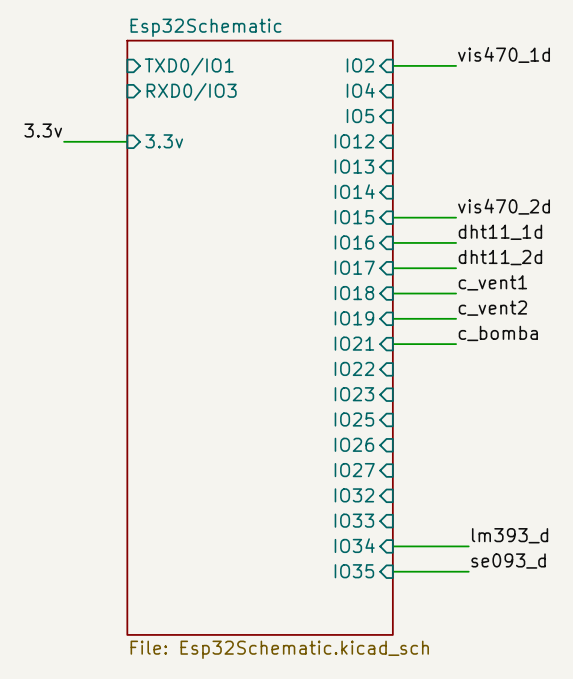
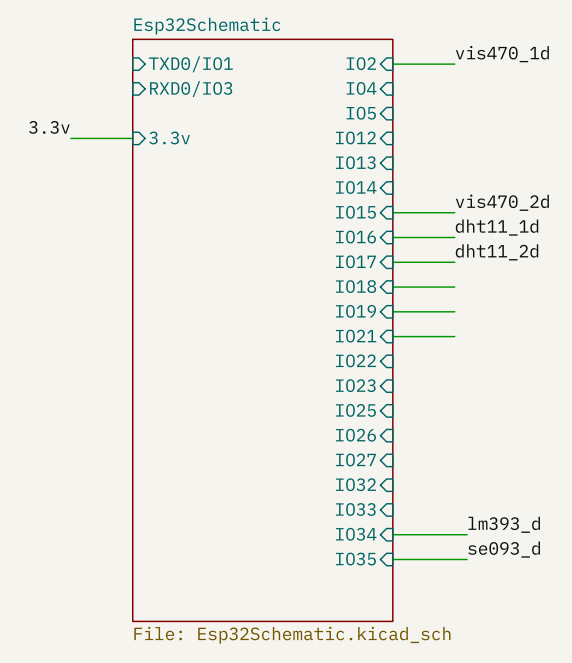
label: c_vent1 (492, 282) -> none
label: c_vent2 (492, 308) -> none
label: c_bomba (498, 333) -> none

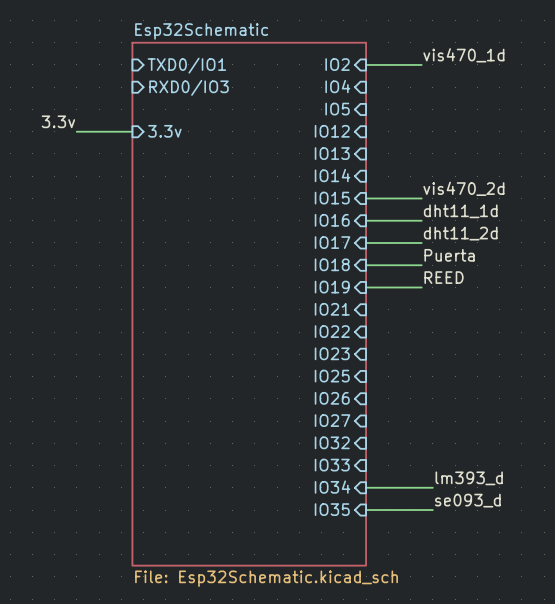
label: none -> Puerta (449, 255)
label: none -> REED (444, 277)
wire: (392, 336) (454, 336) -> none

